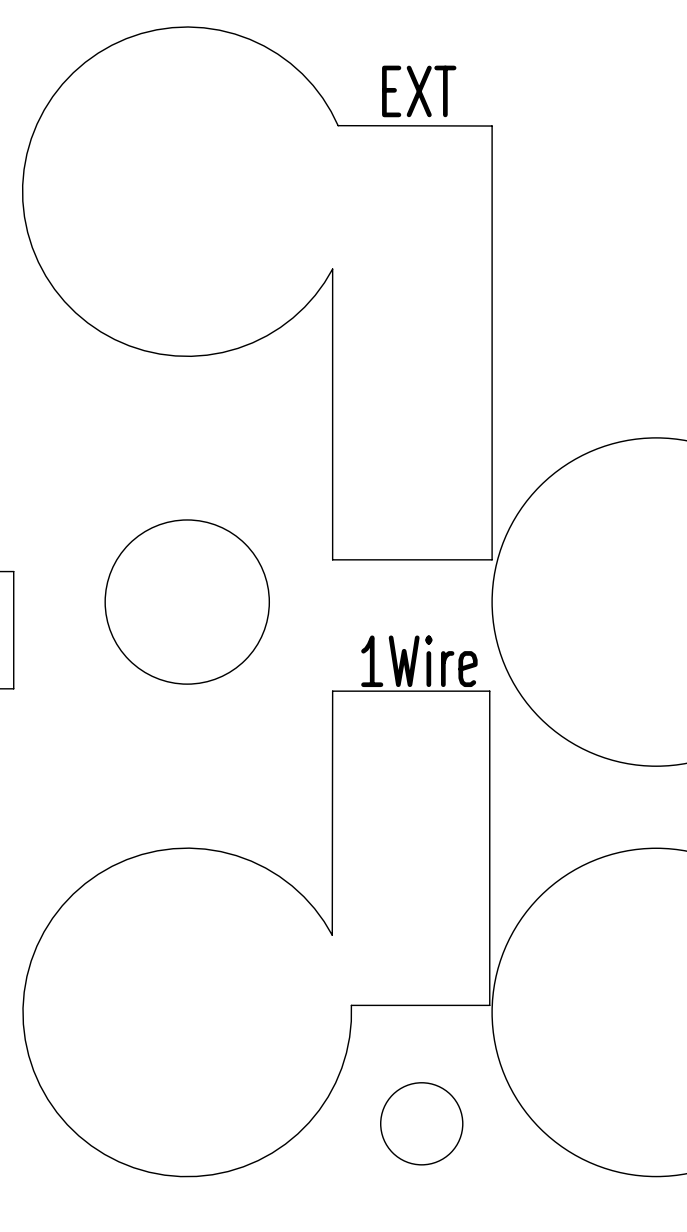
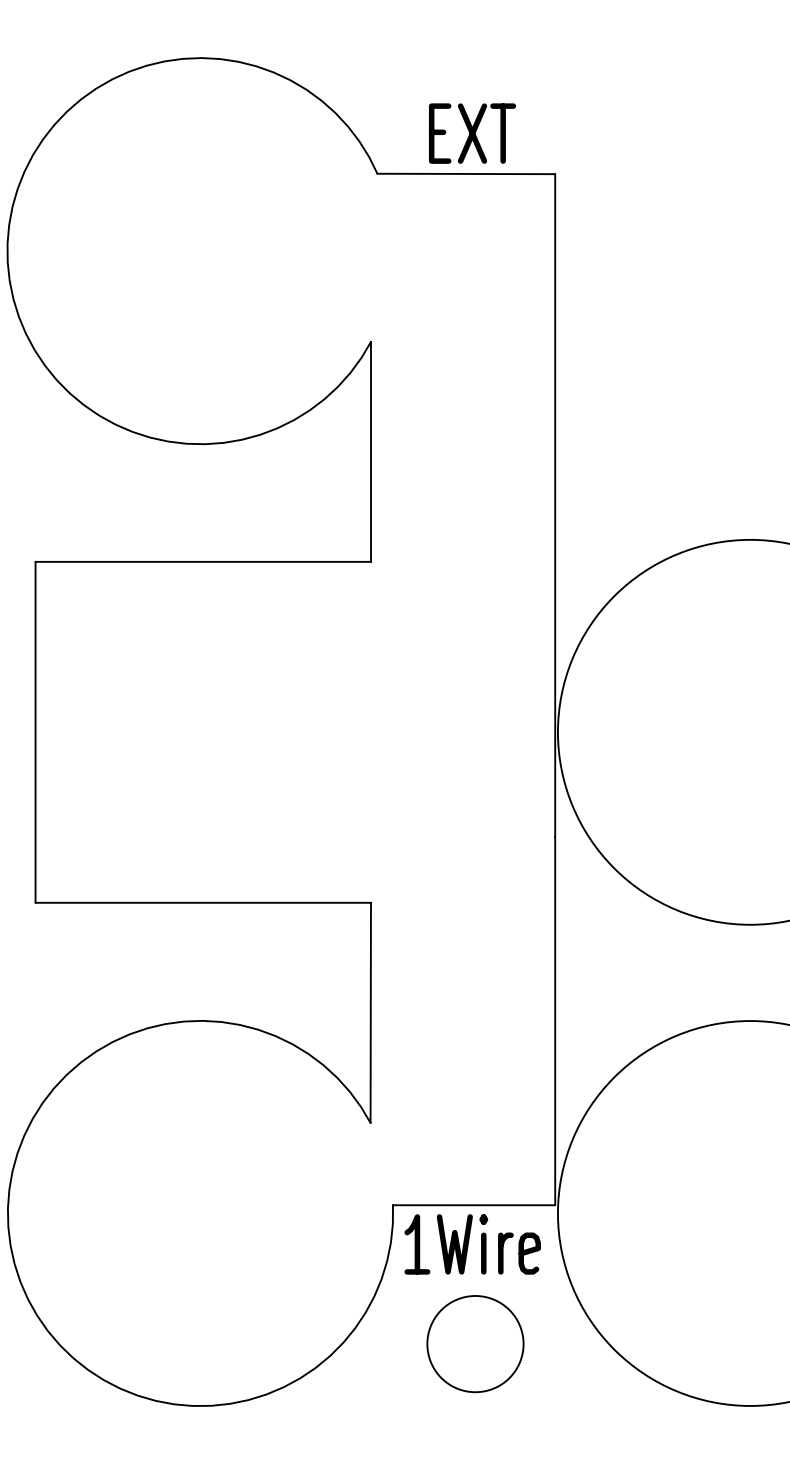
board edge: (338, 125) (492, 126) (492, 559) (332, 559) (332, 456) -> (377, 173) (555, 174) (555, 836)
round board edge: [104, 519, 270, 685] -> none
text position: 1Wire (419, 661) -> 1Wire (472, 1244)
board edge: (489, 691) (332, 691) (332, 935) -> (370, 561) (35, 561) (35, 902) (370, 902) (370, 1122)

